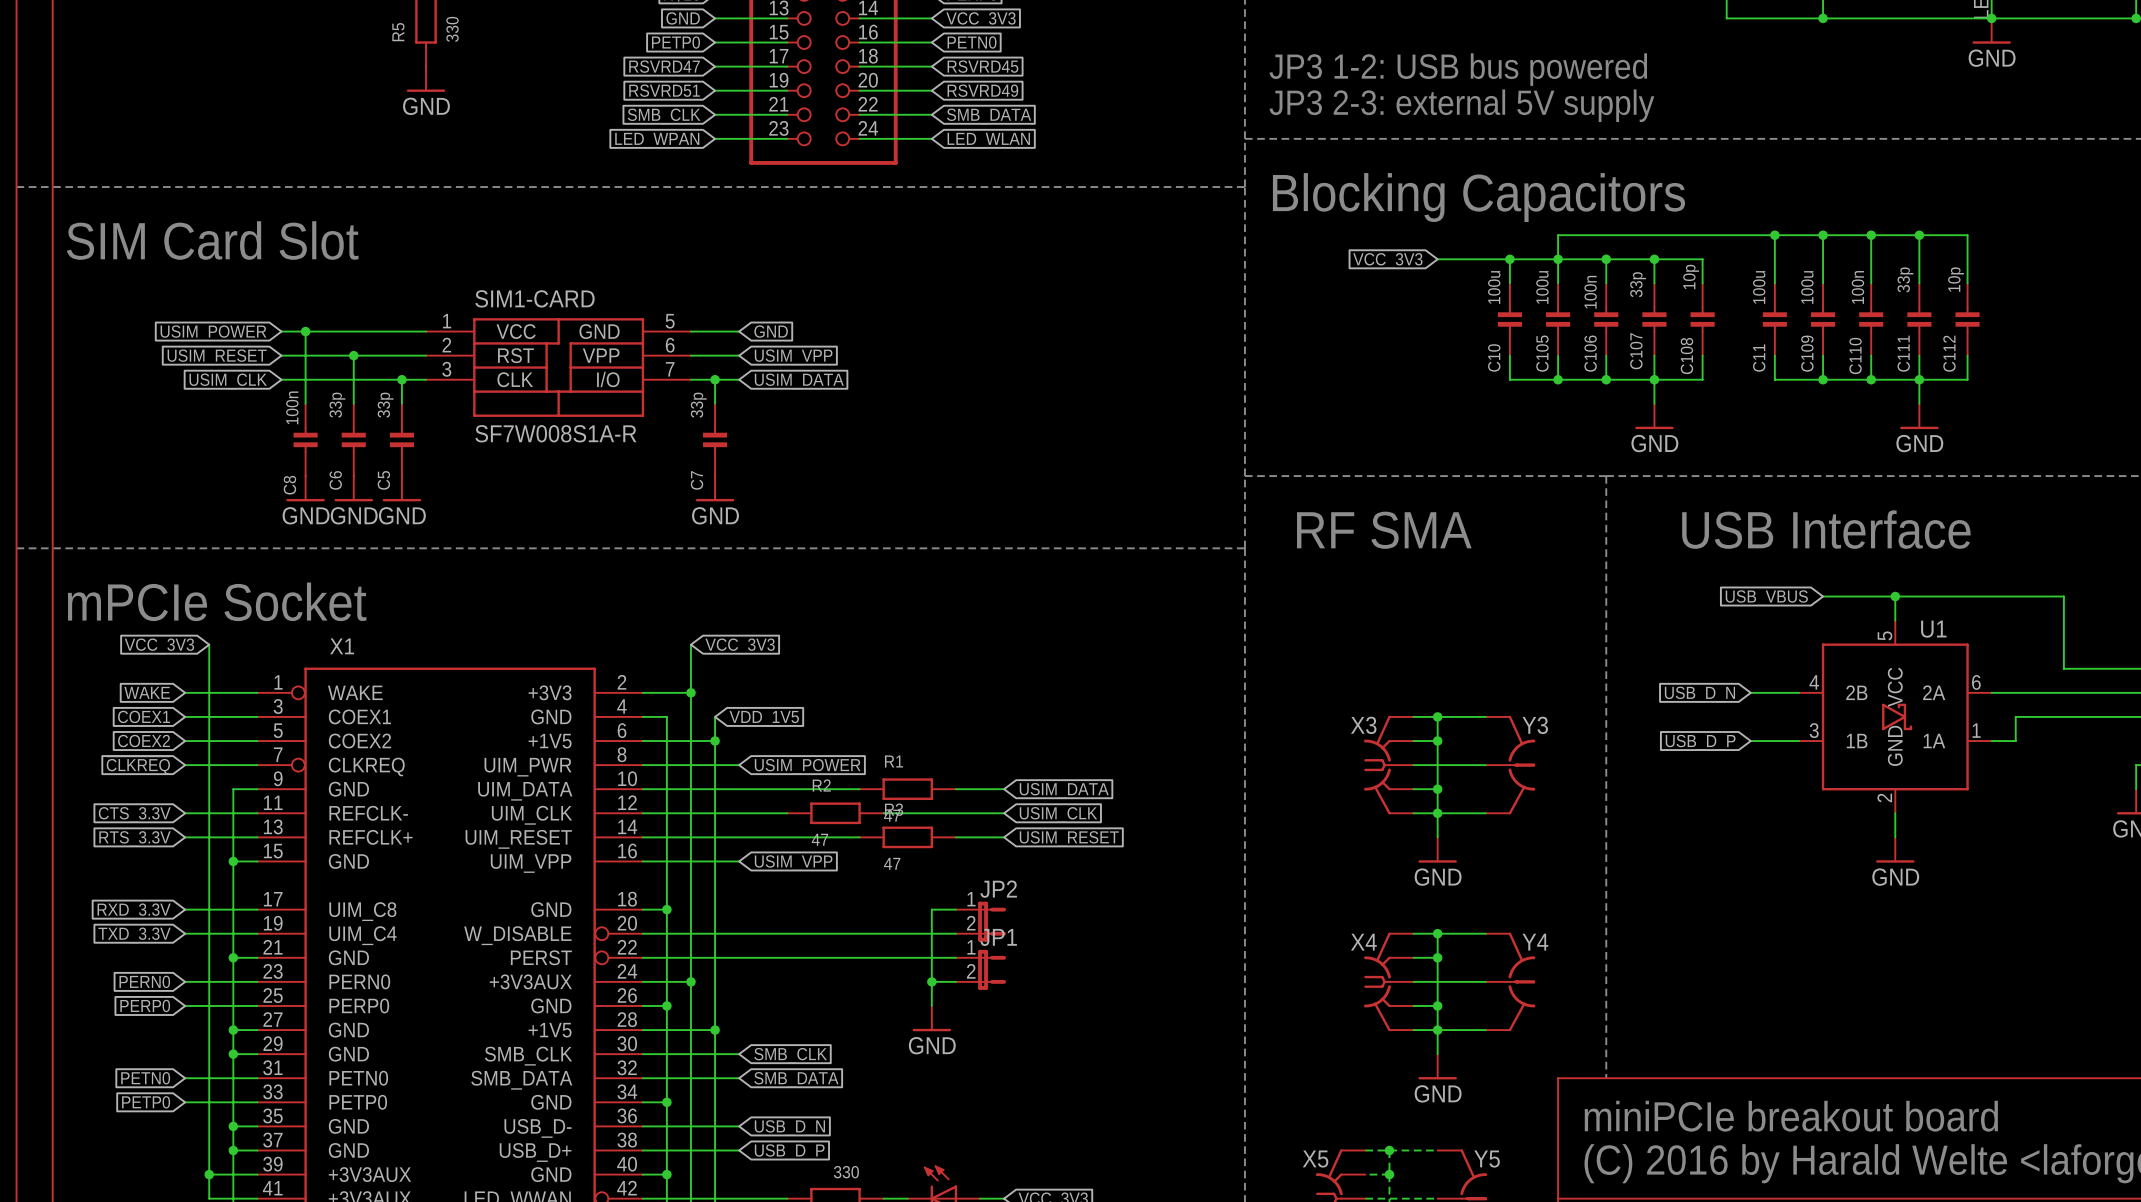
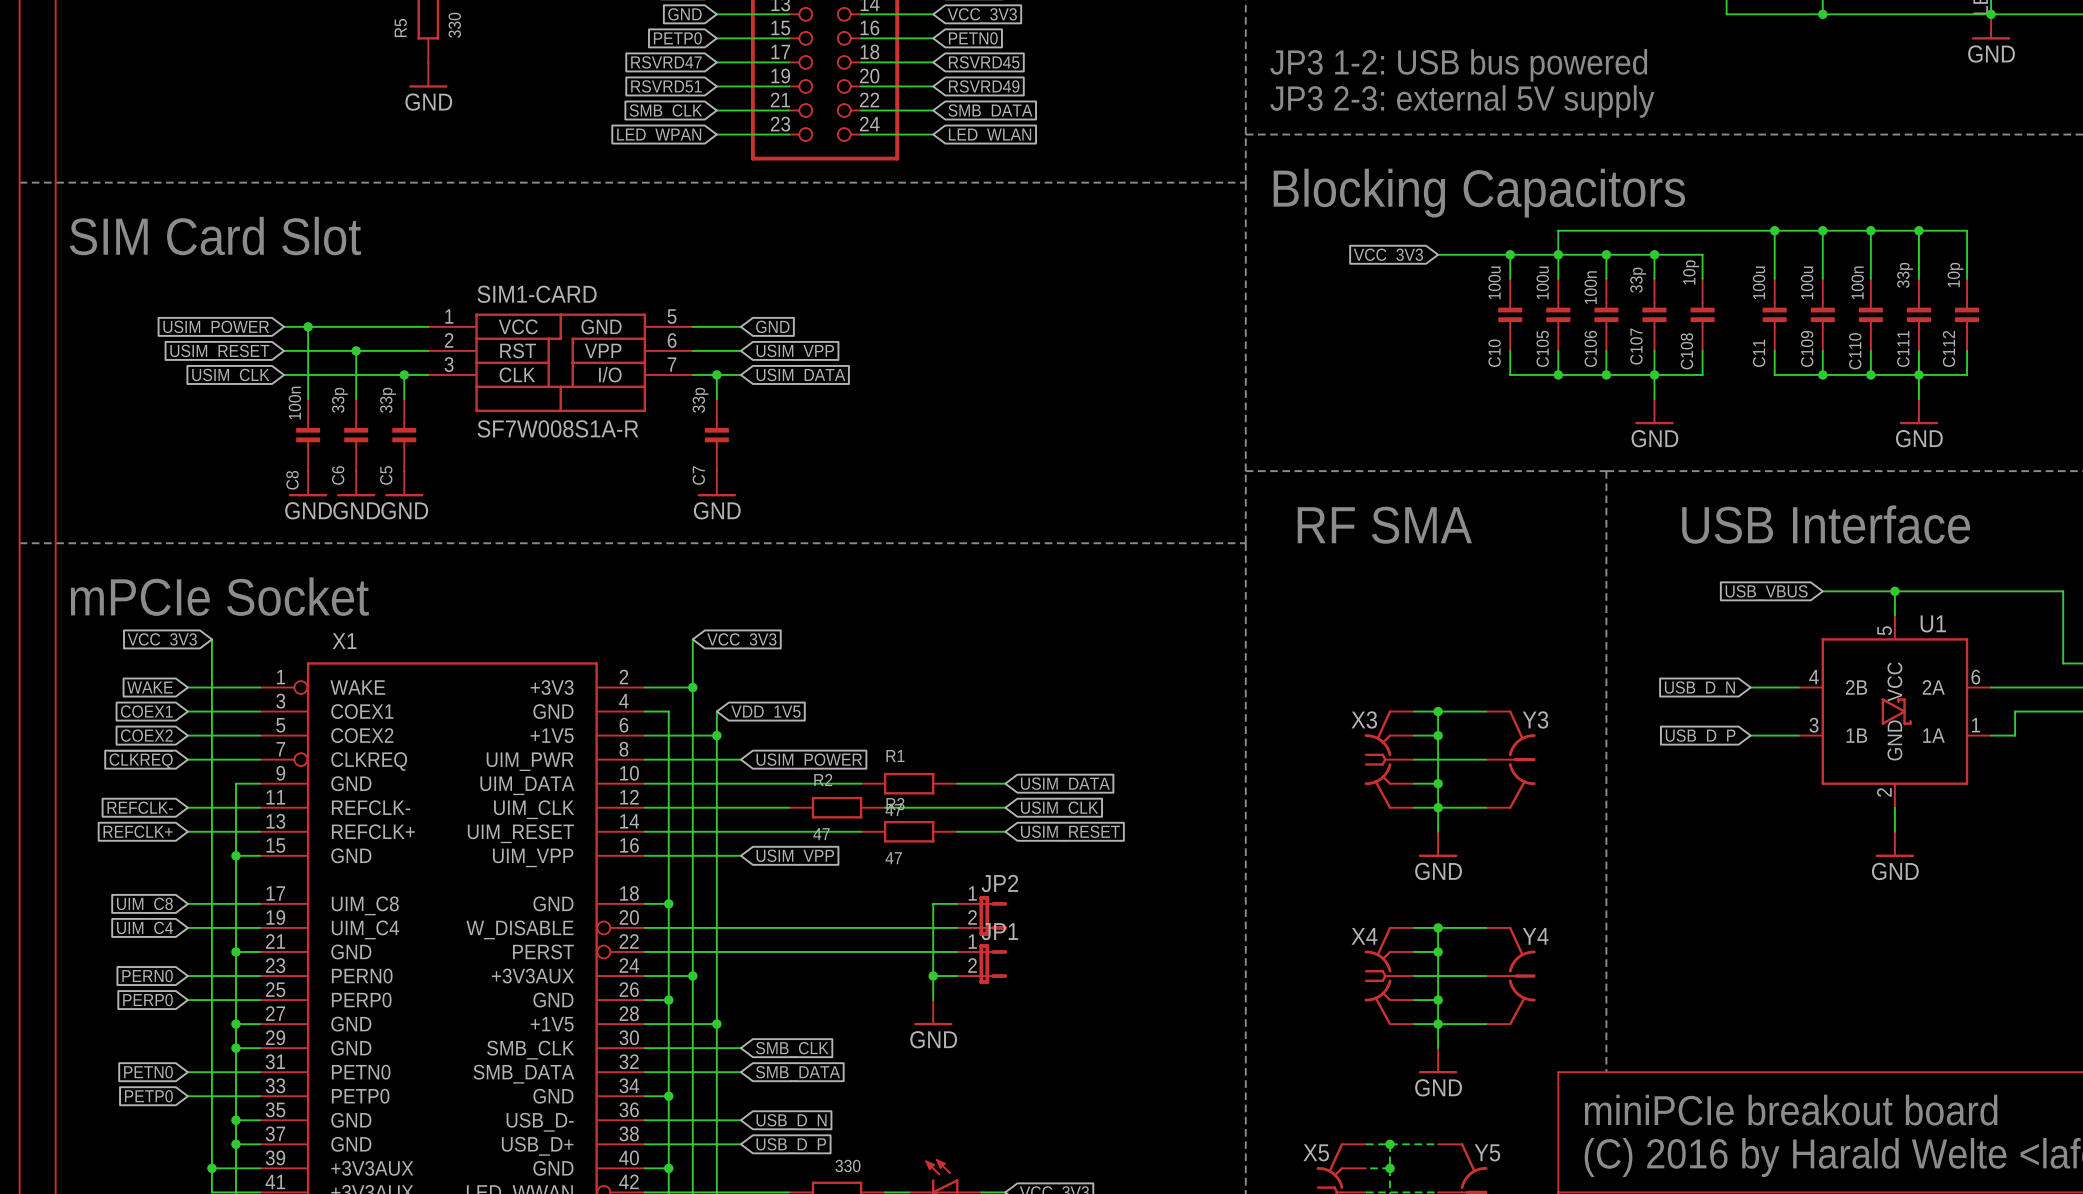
global label: CTS_3.3V (134, 814) -> REFCLK- (140, 807)
global label: RTS_3.3V (134, 839) -> REFCLK+ (138, 831)
global label: RXD_3.3V (134, 911) -> UIM_C8 (144, 905)
global label: TXD_3.3V (134, 935) -> UIM_C4 (145, 929)

